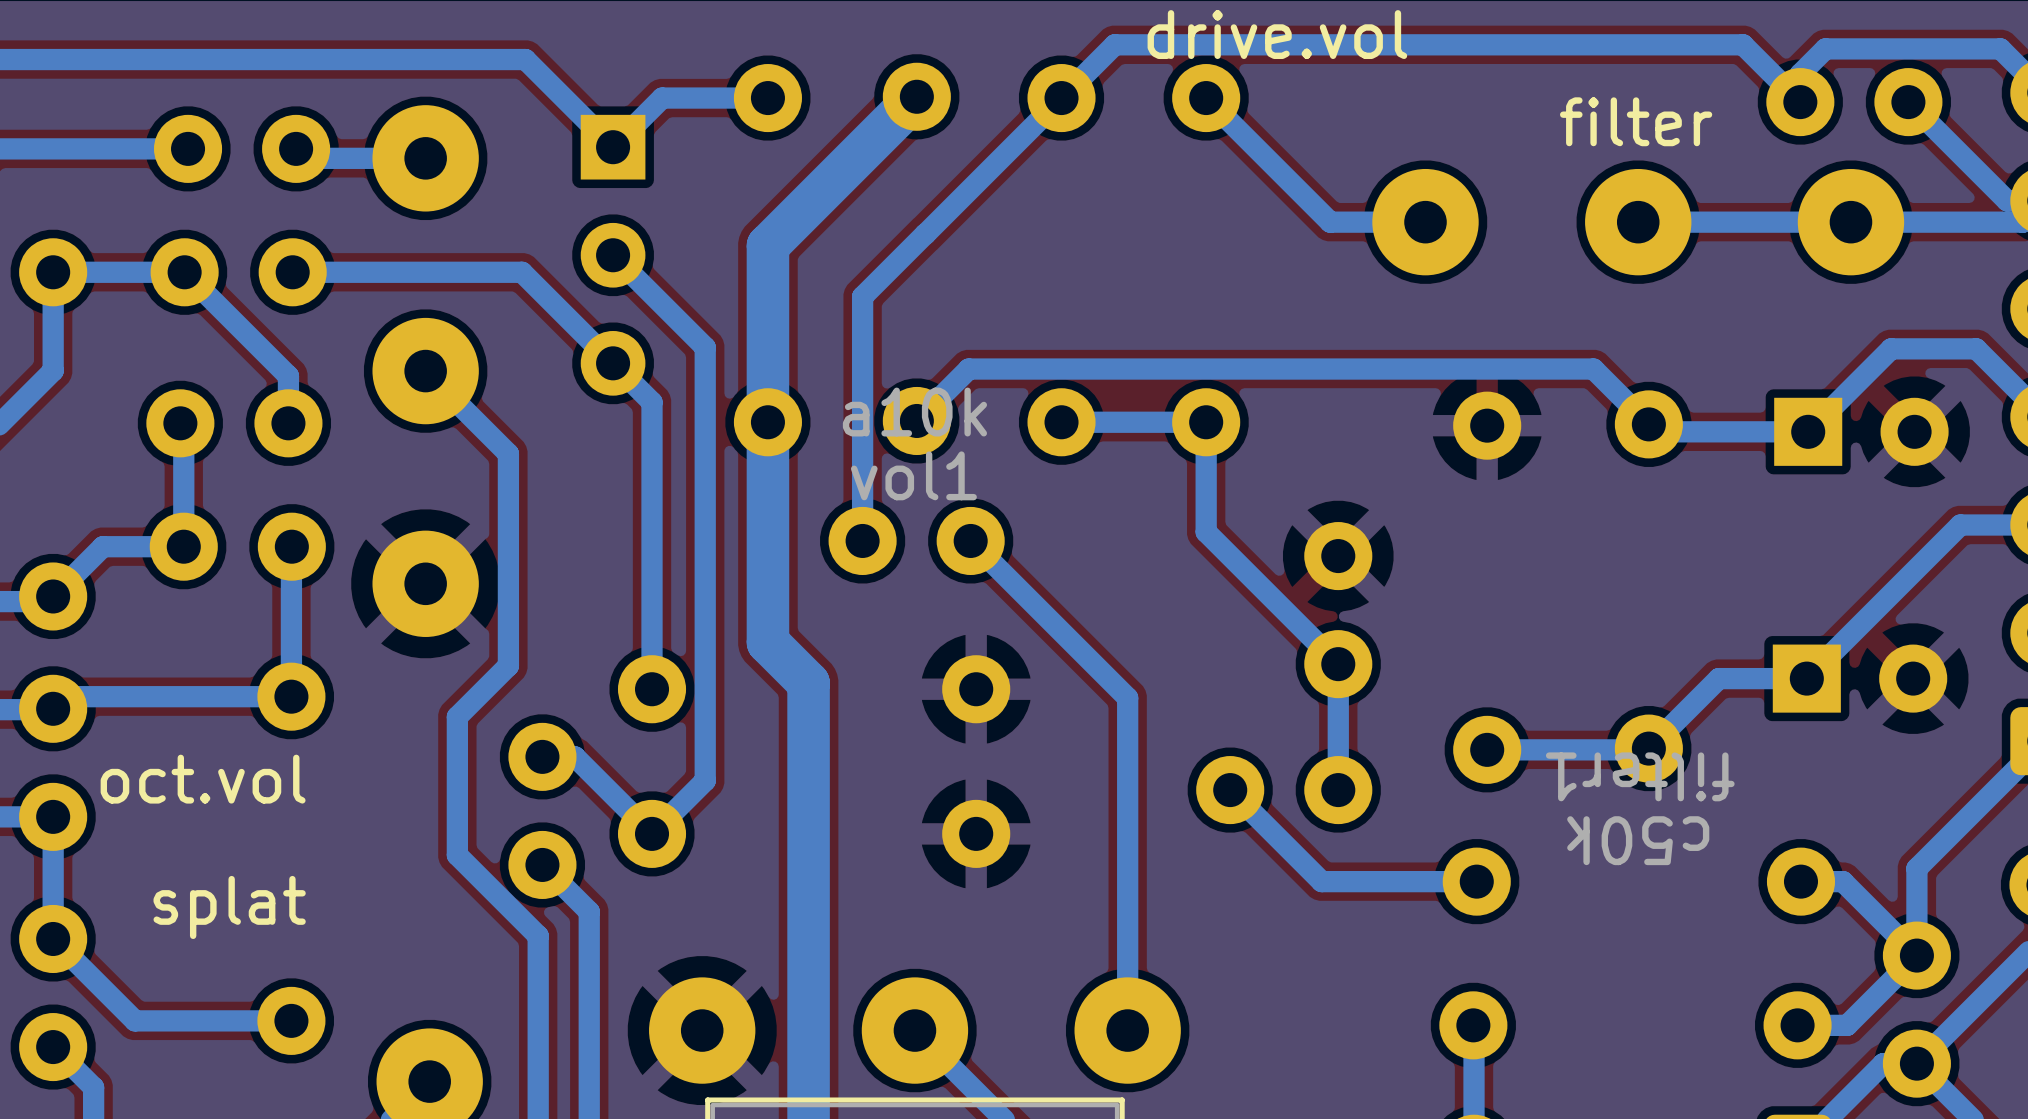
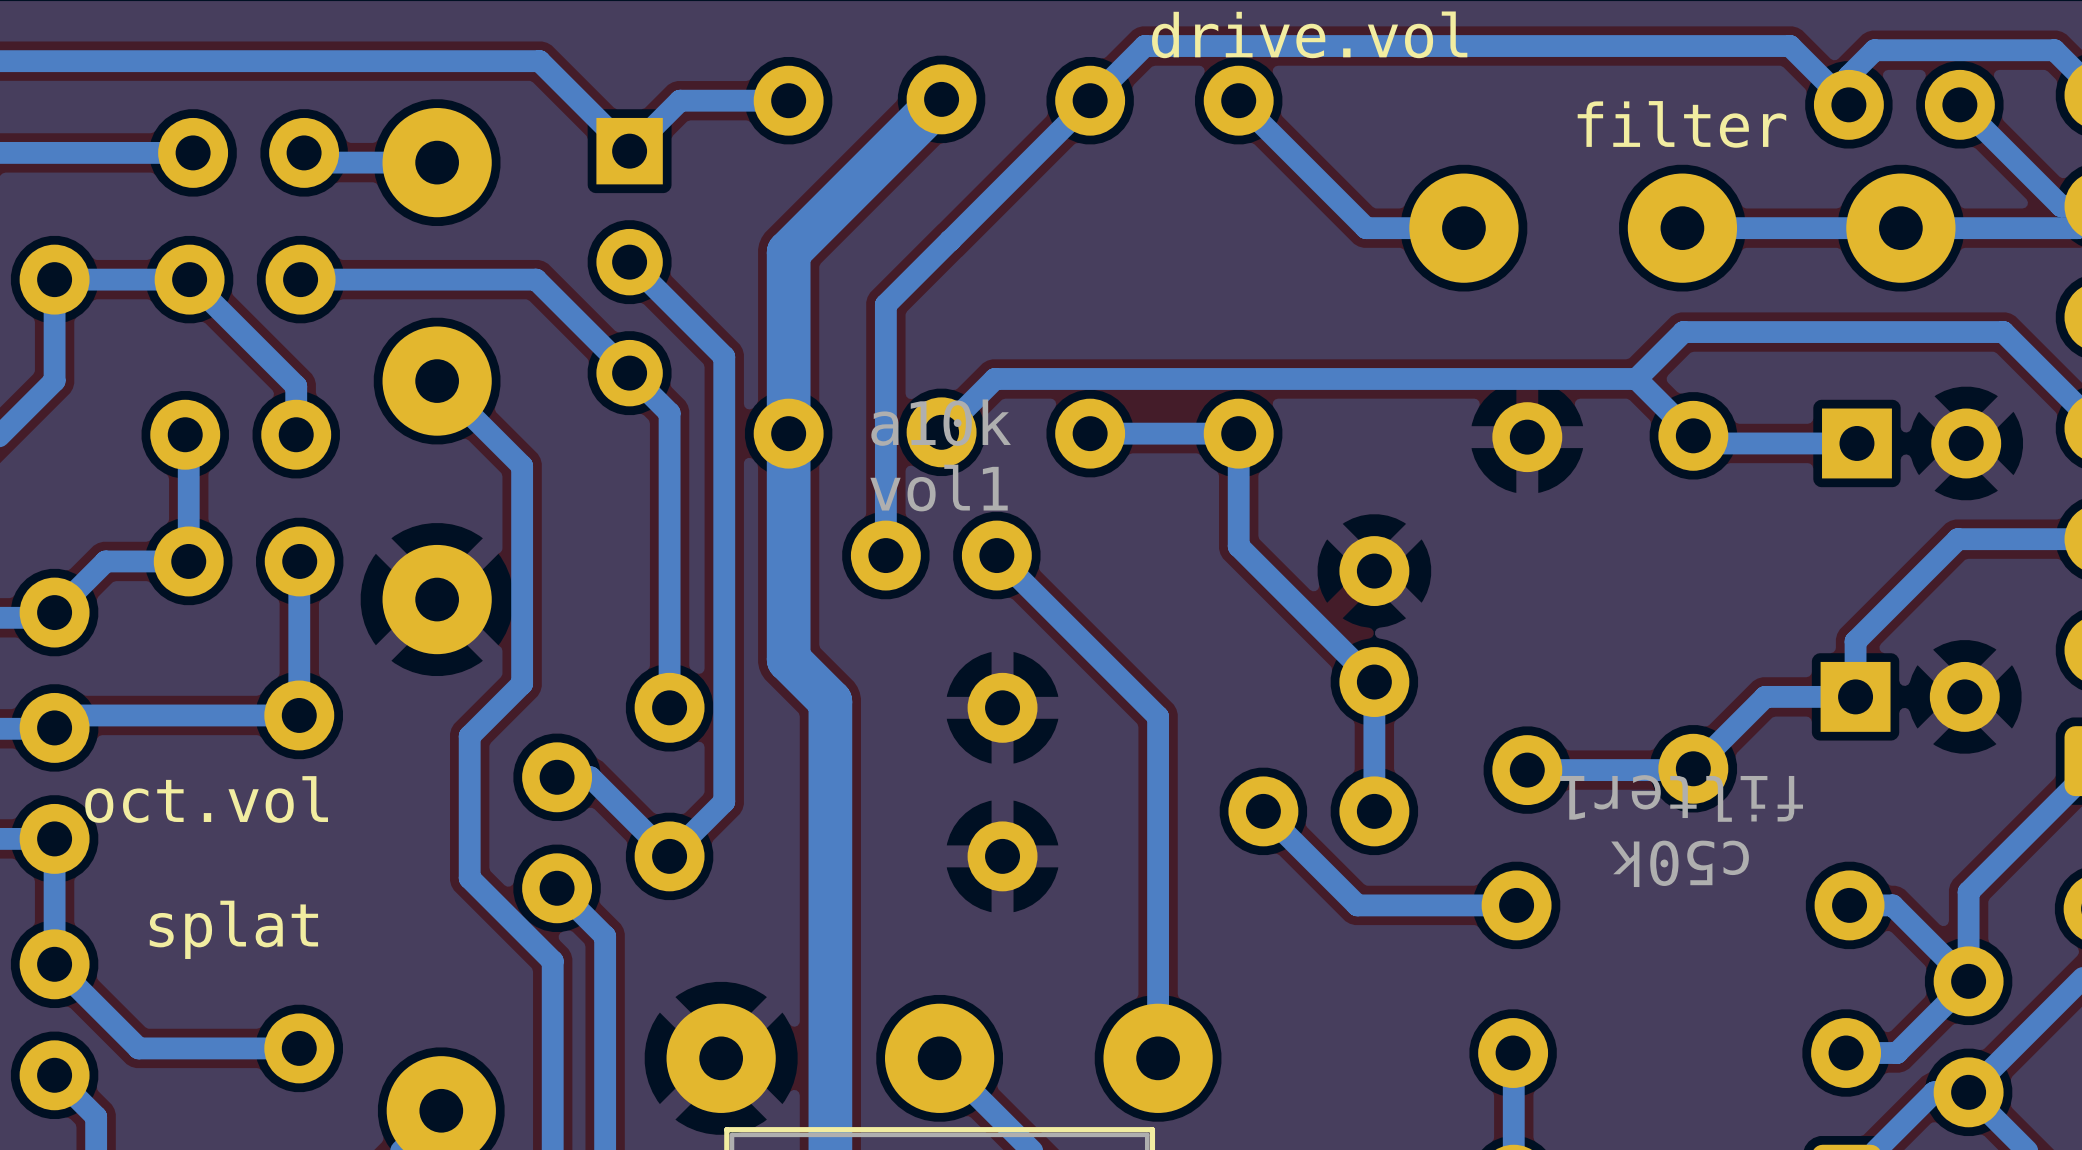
bottom track: (1976, 348) (1891, 348) (1808, 431) -> (2029, 358) (2003, 332) (1683, 332) (1636, 378)
bottom track: (1960, 525) (1806, 678) -> (2013, 539) (1957, 539) (1855, 641) (1855, 696)

